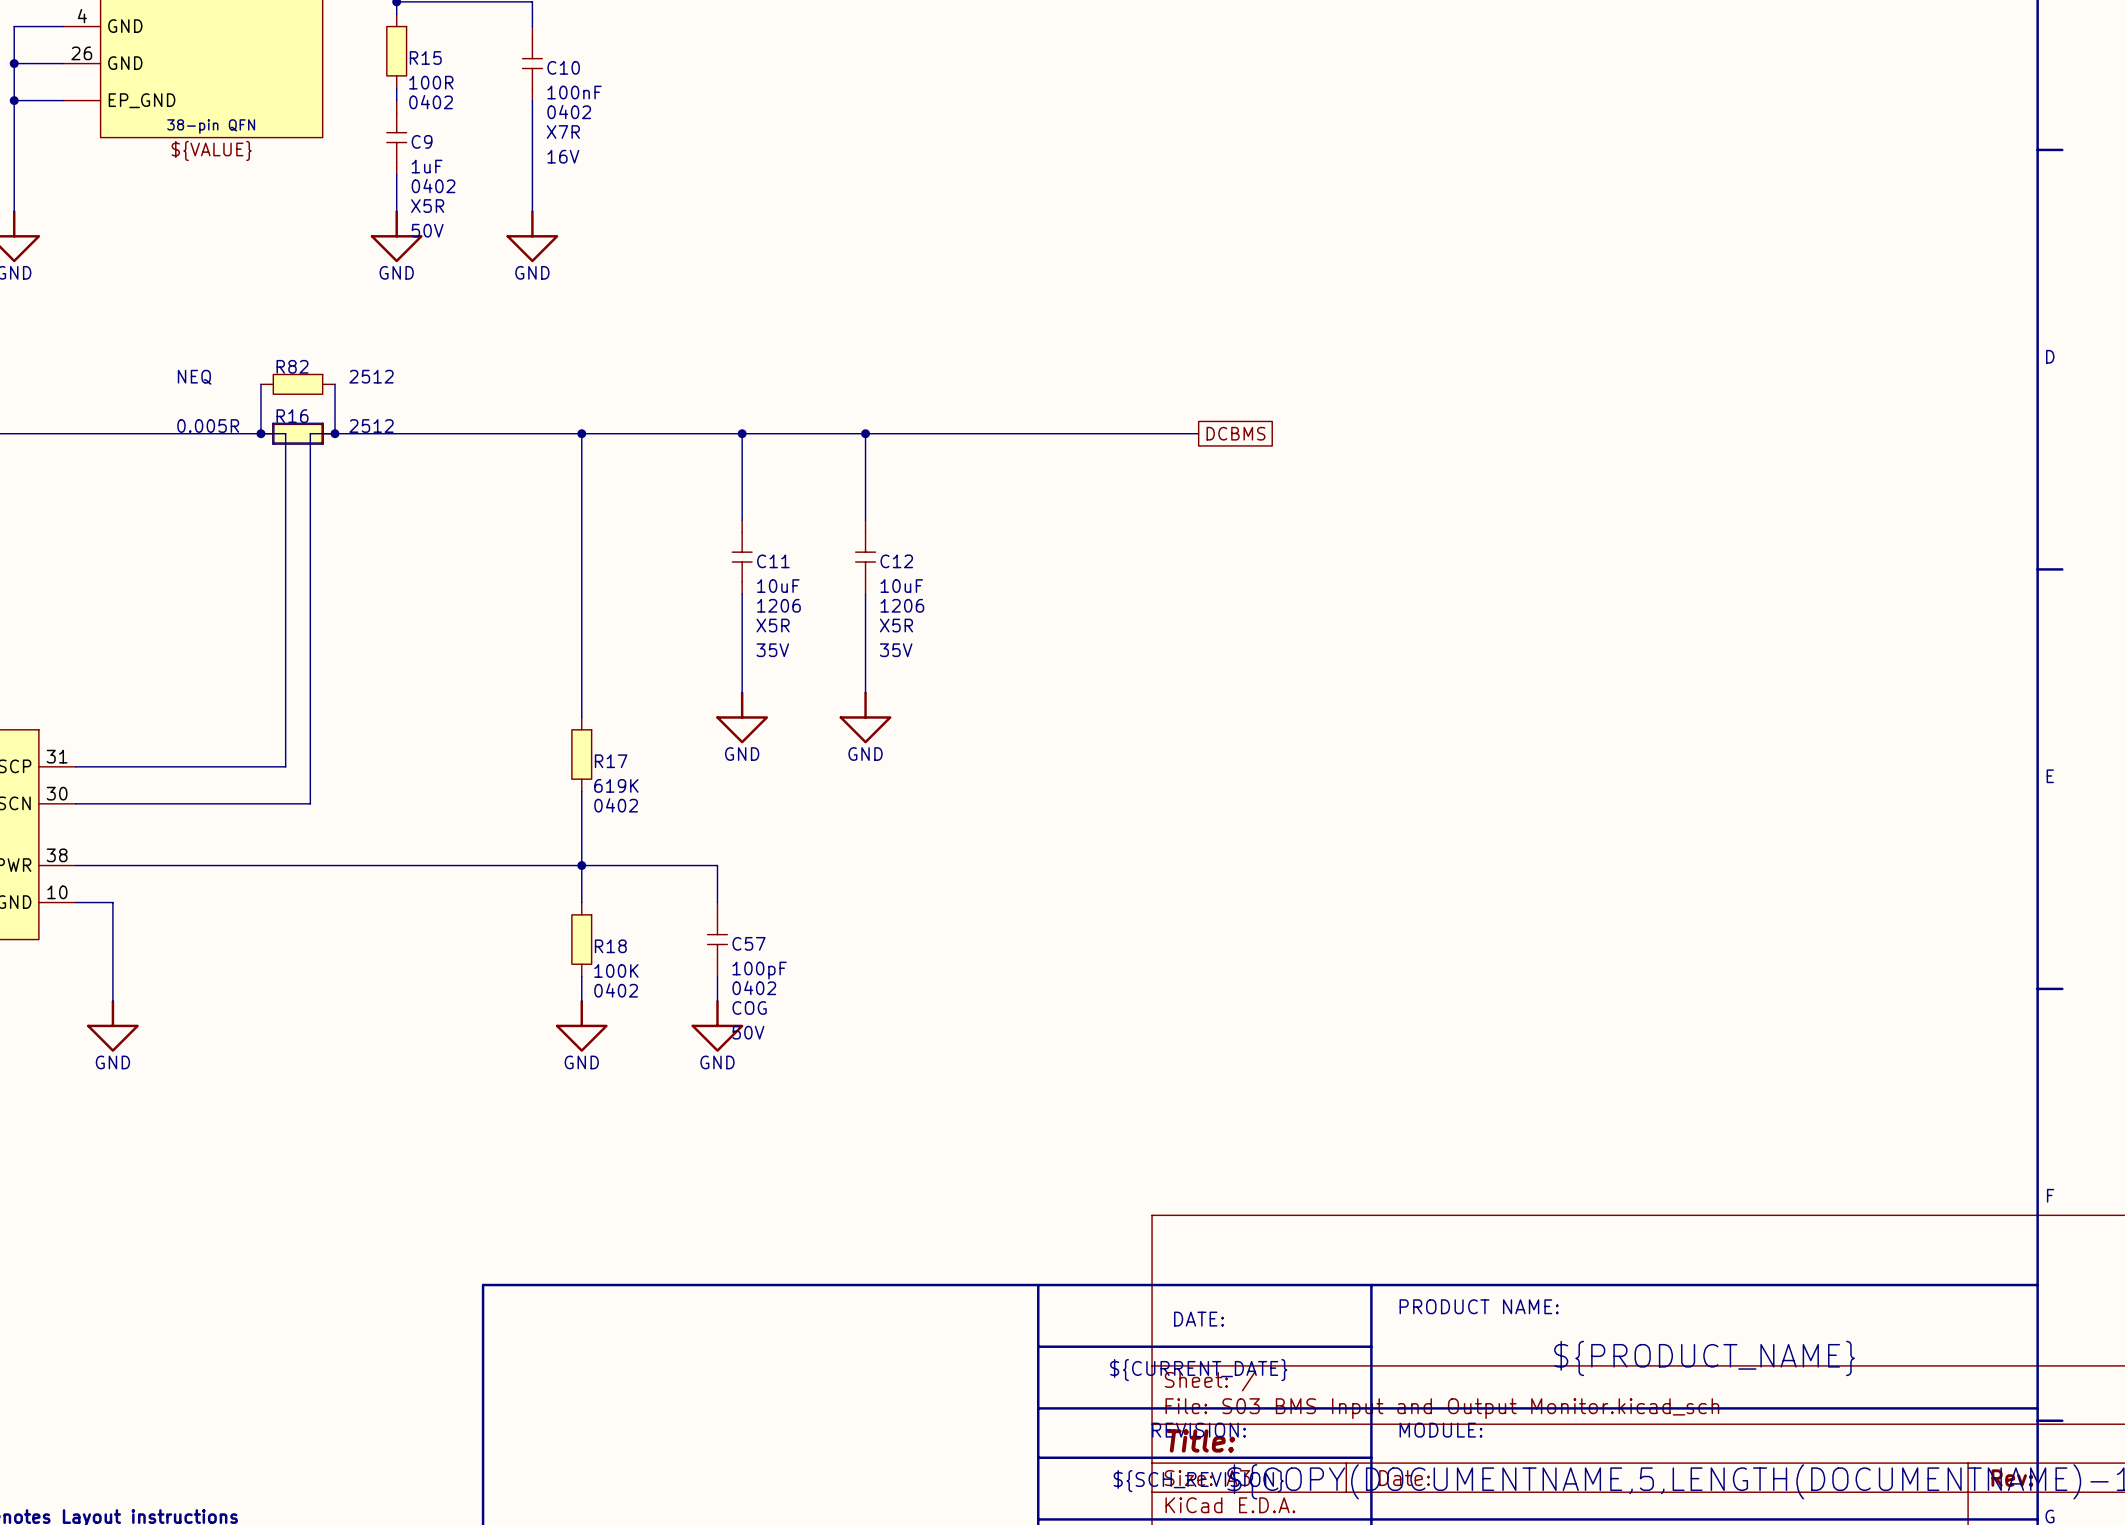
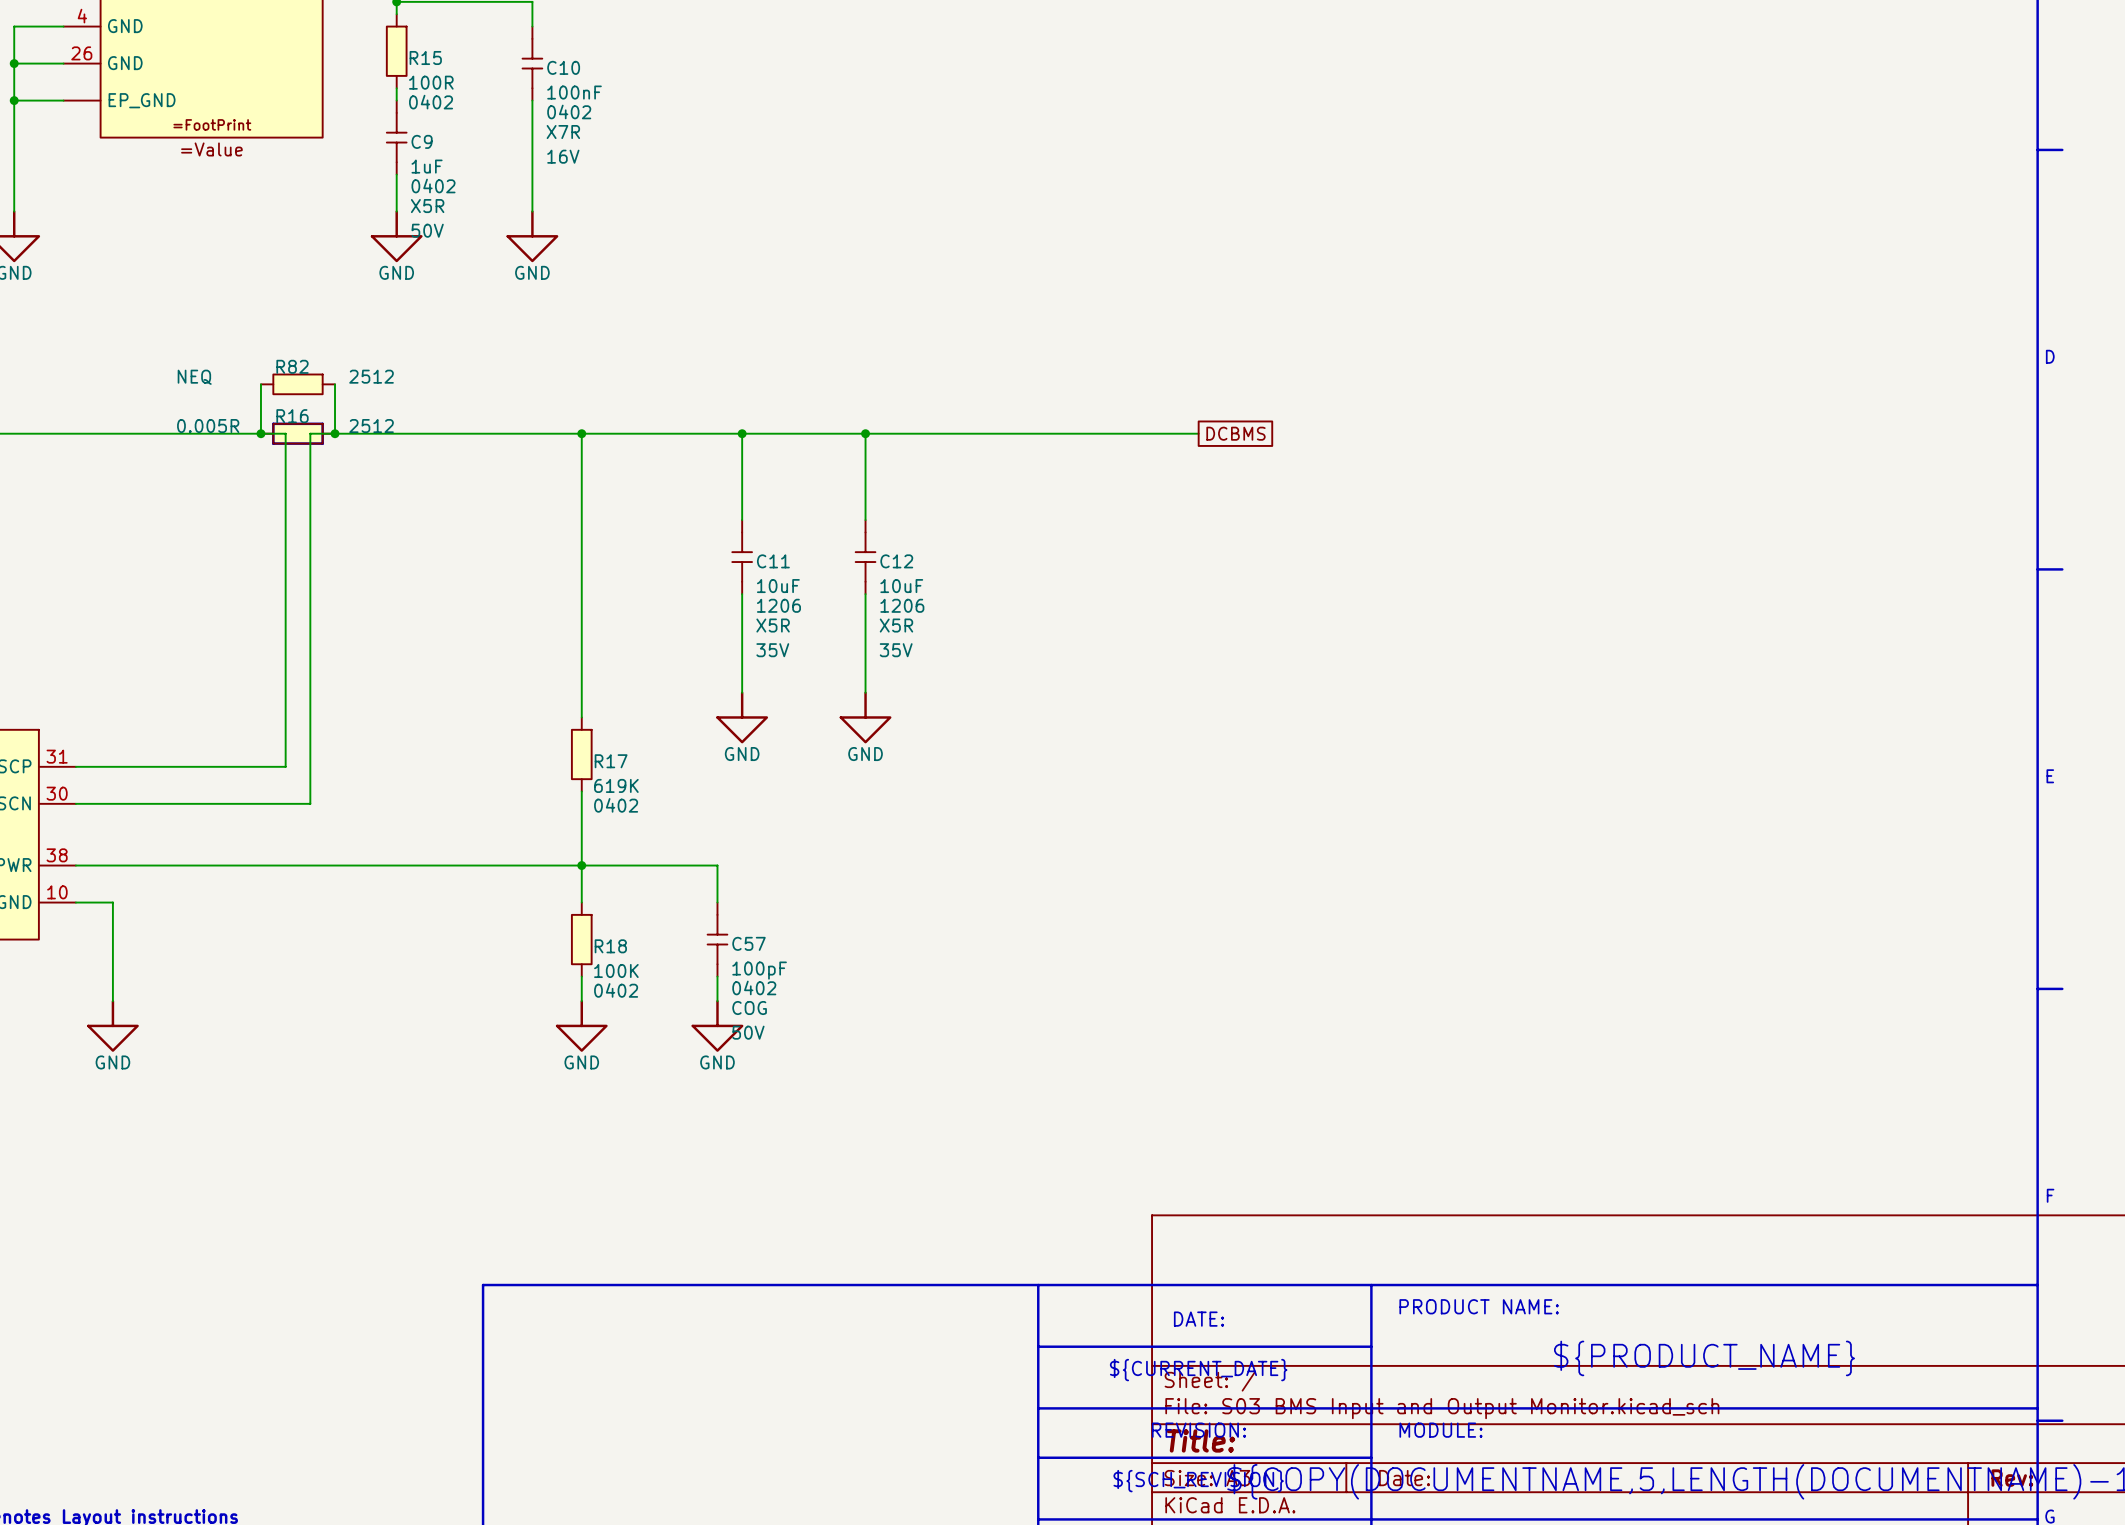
part text: none -> =FootPrint (212, 124)
part text: 38-pin QFN (211, 126) -> none
part text: ${VALUE} (211, 150) -> =Value (211, 149)

